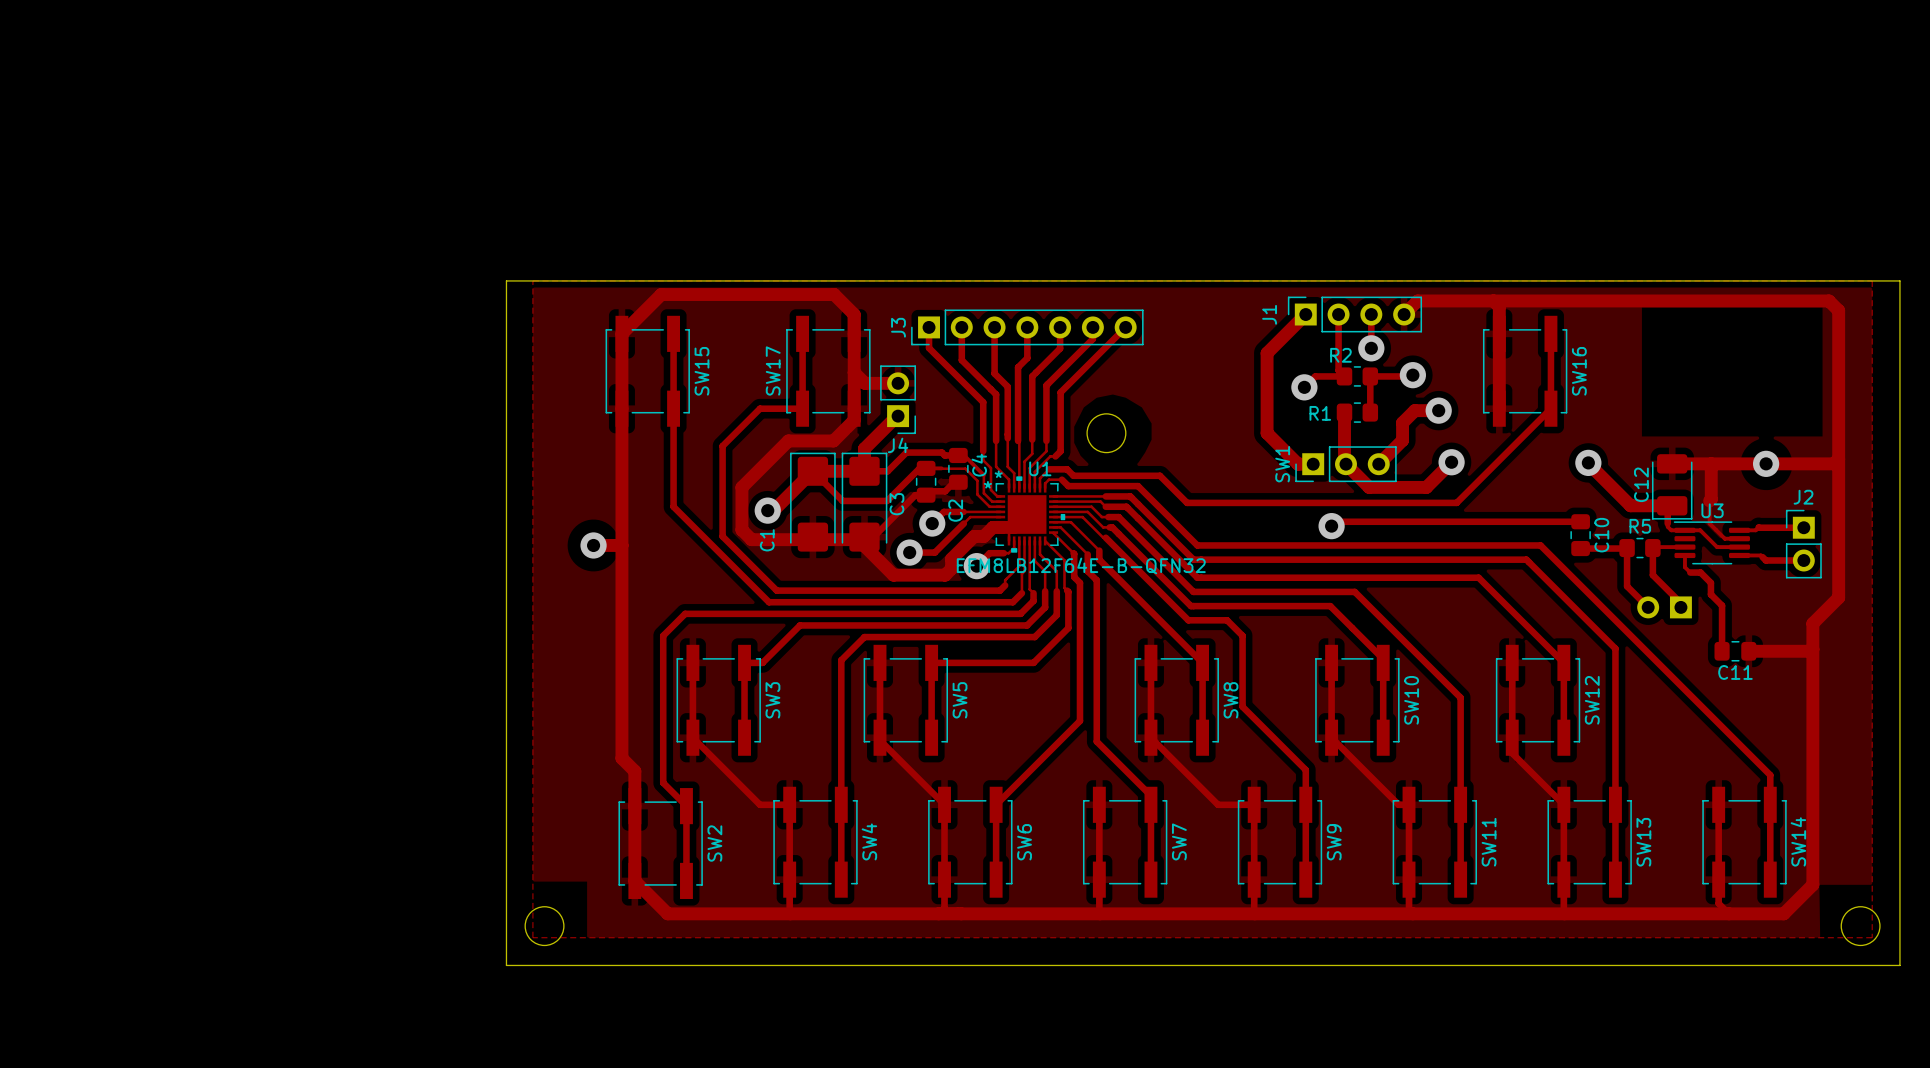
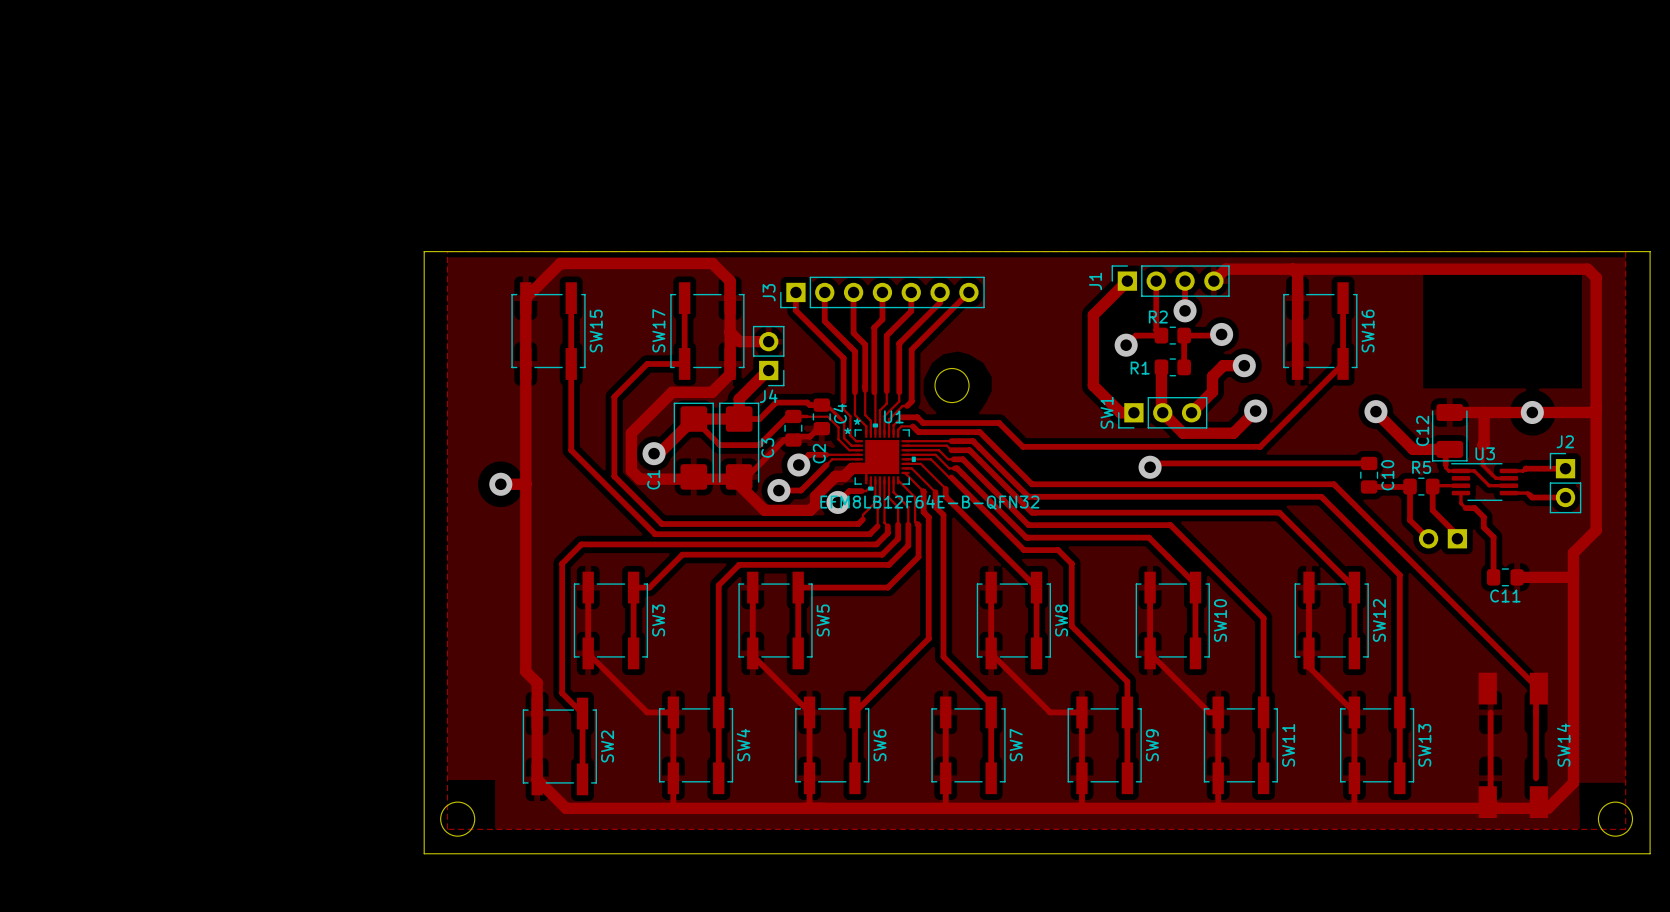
SW14 footprint: [1702, 786, 1787, 898] -> [1478, 672, 1548, 819]

